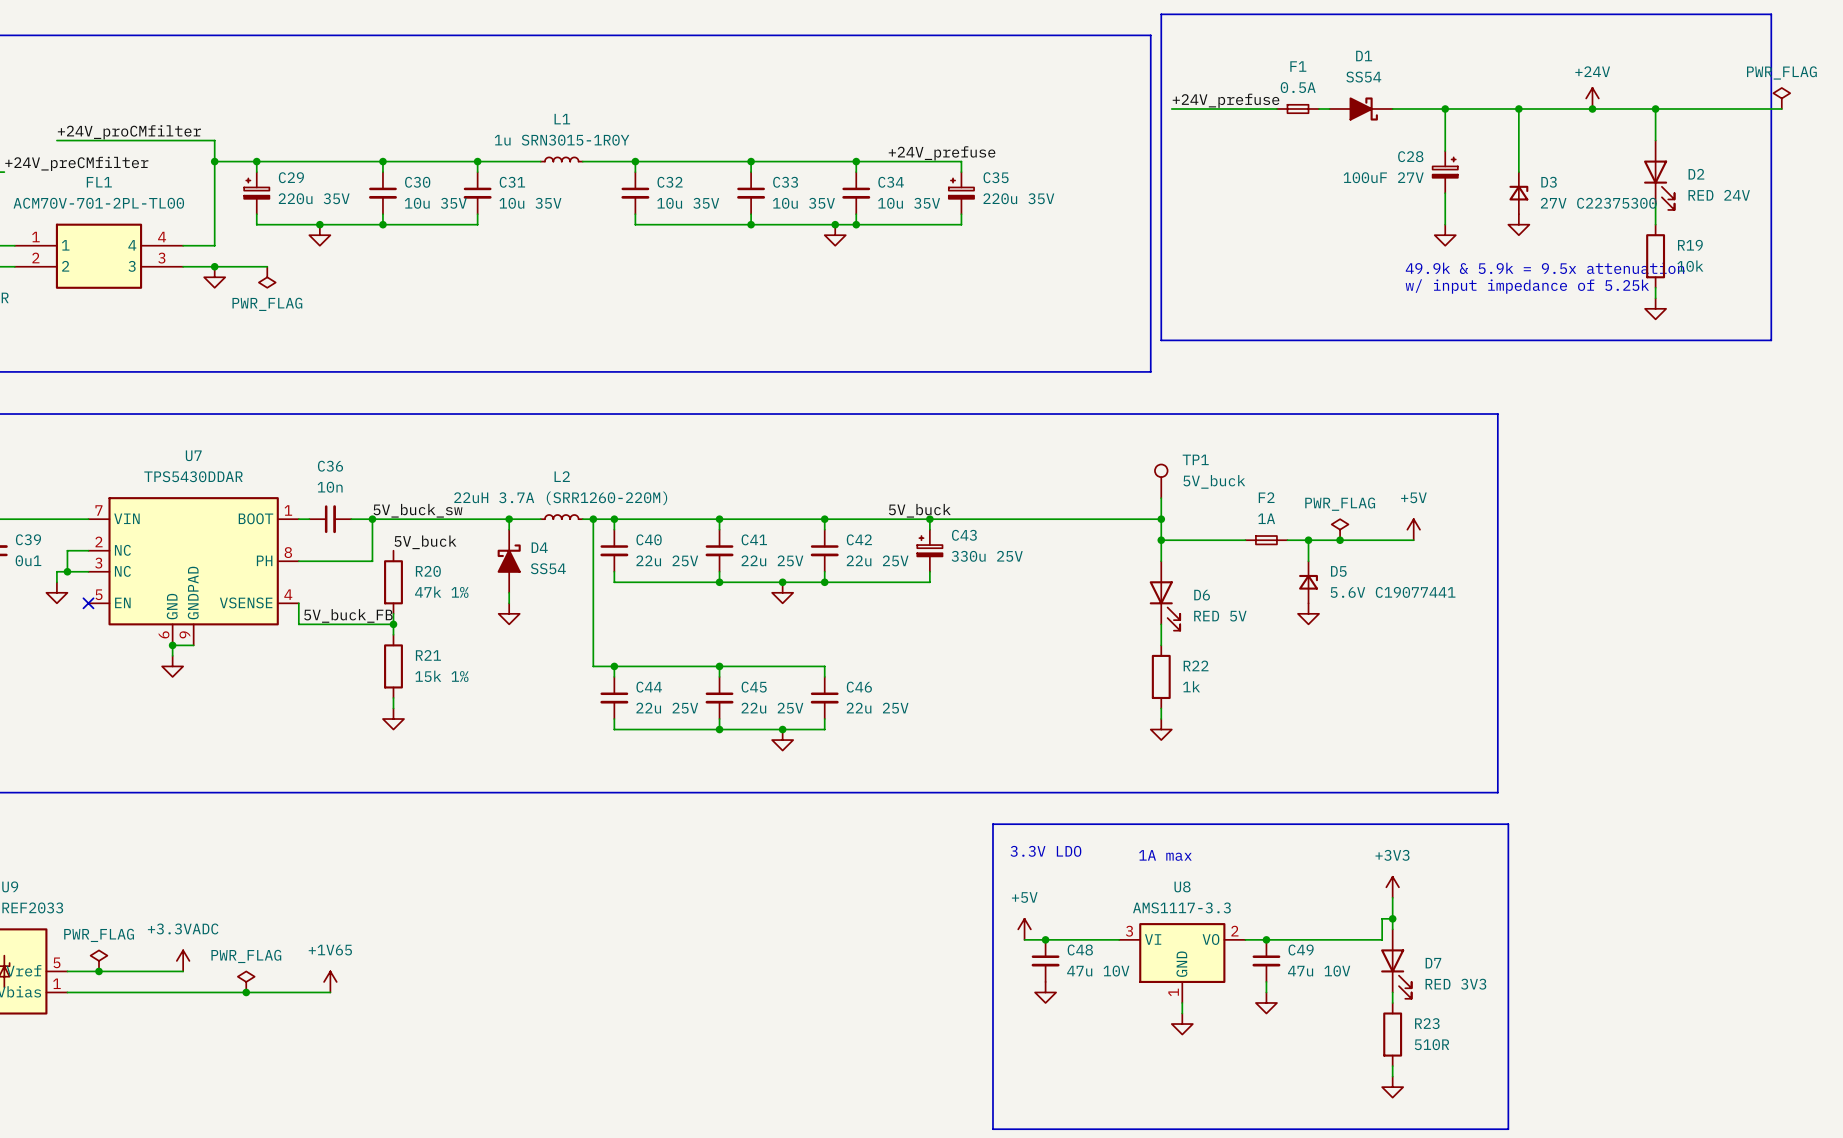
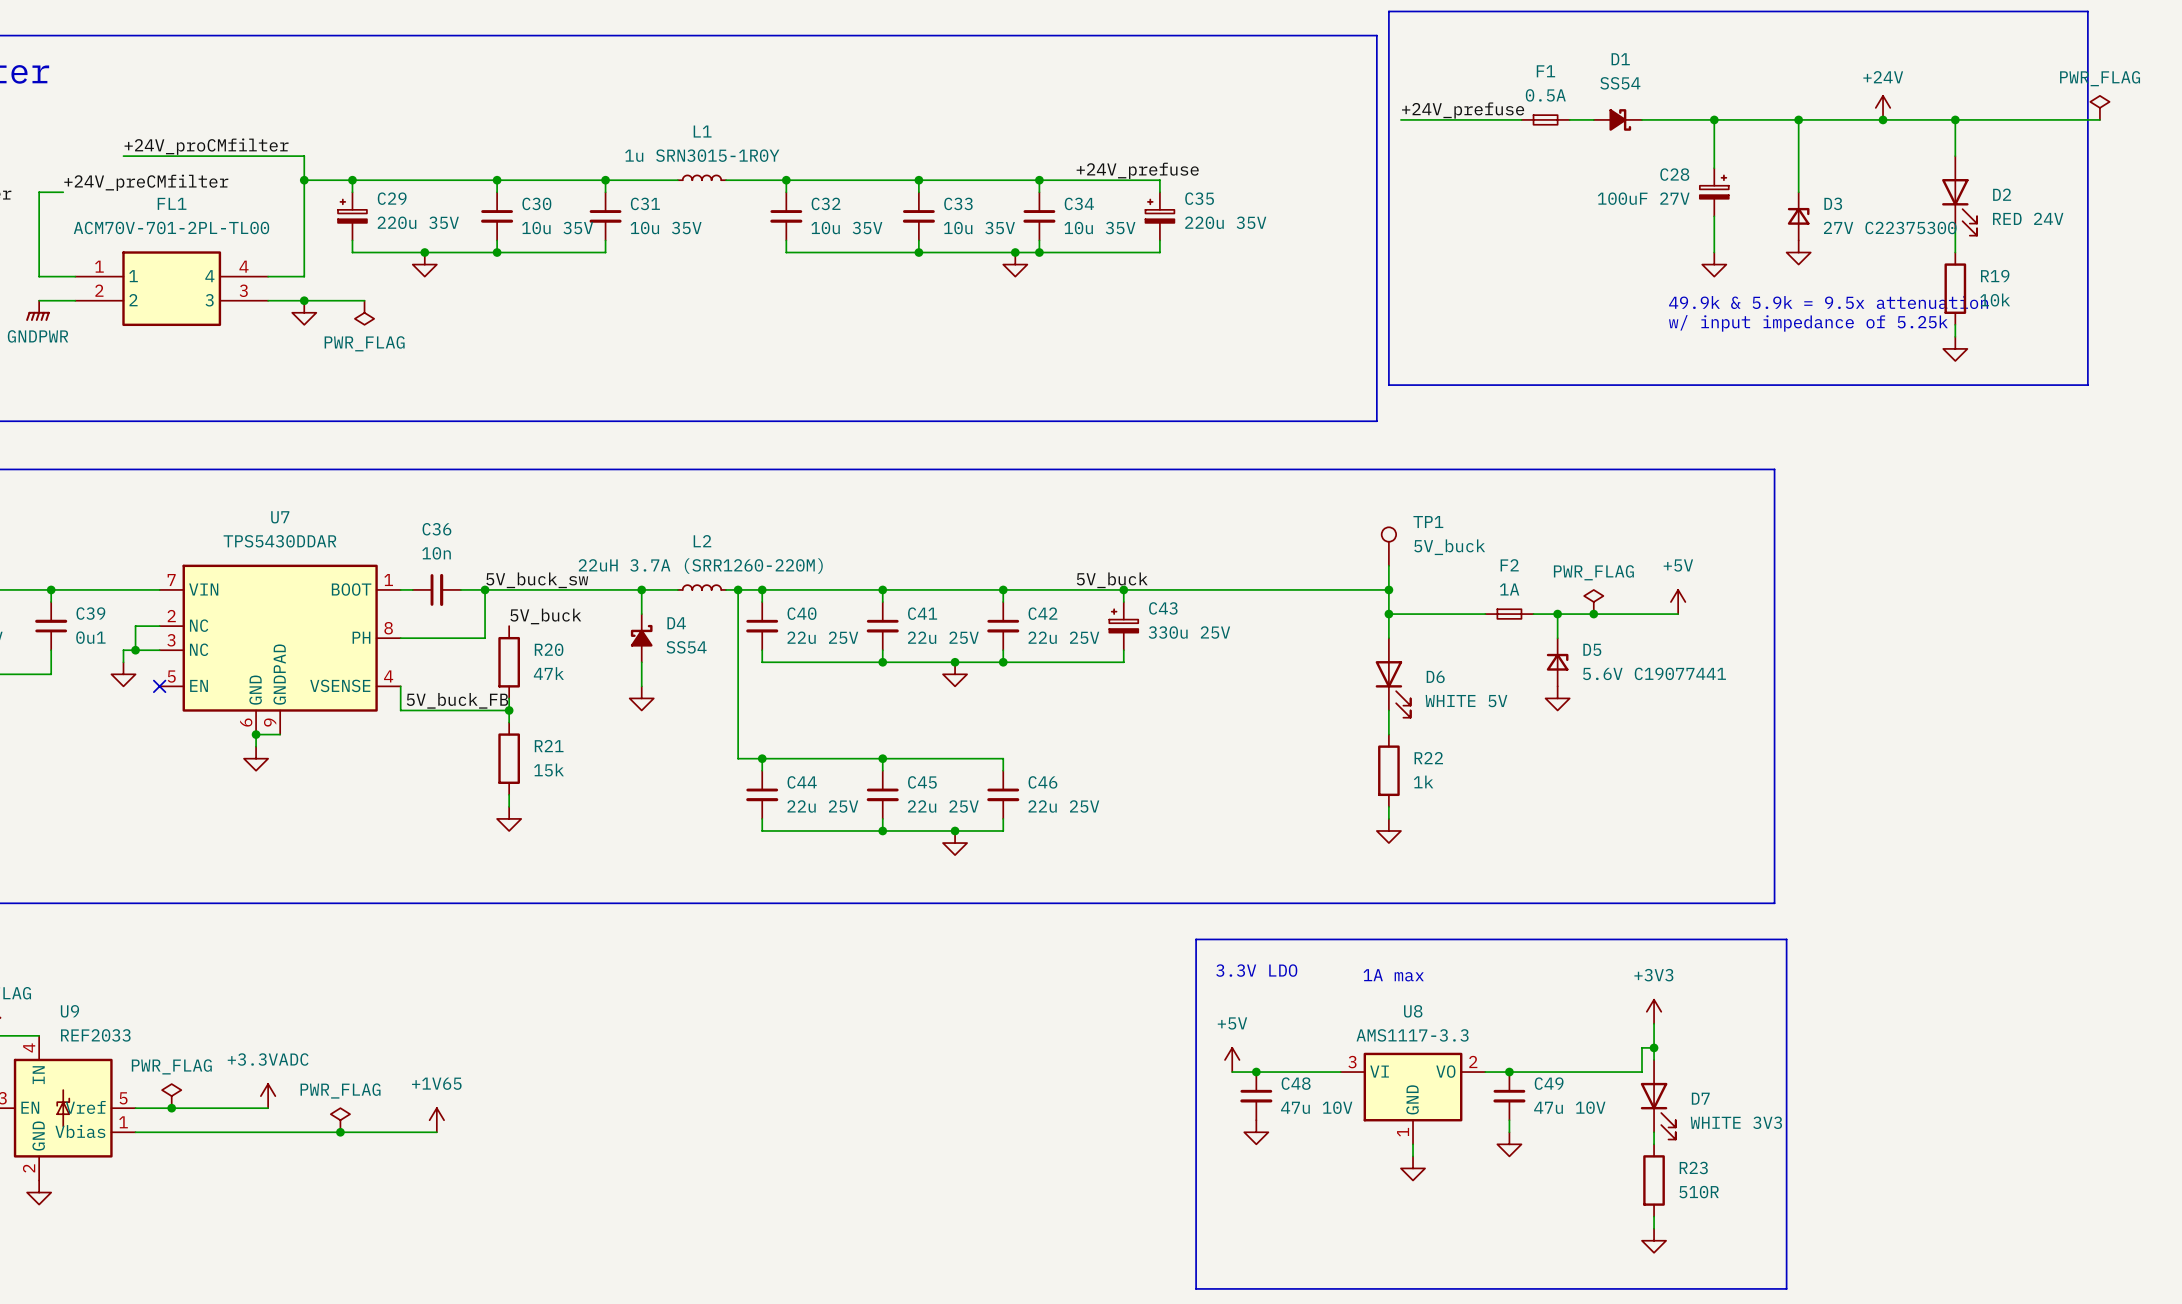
D1 symbol: [1329, 97, 1393, 121] -> [1593, 109, 1642, 131]
D4 symbol: [497, 529, 521, 593] -> [630, 614, 653, 663]
R20 value: 47k 1% (441, 592) -> 47k (548, 673)
D6 value: RED 5V (1220, 616) -> WHITE 5V (1466, 701)
R21 value: 15k 1% (441, 676) -> 15k (549, 770)
D7 value: RED 3V3 (1455, 984) -> WHITE 3V3 (1736, 1122)

